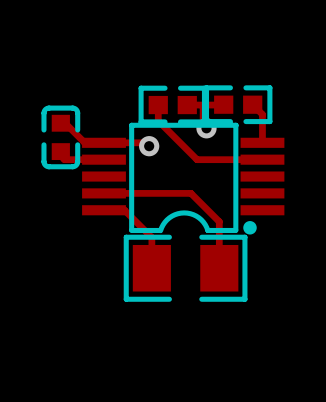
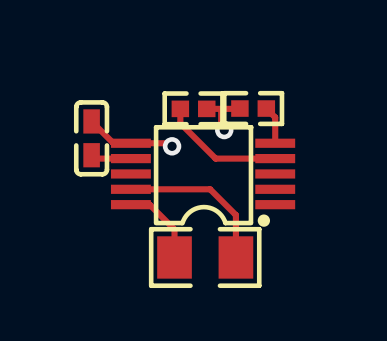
part footprint: [41, 105, 81, 170] -> [73, 100, 110, 177]

